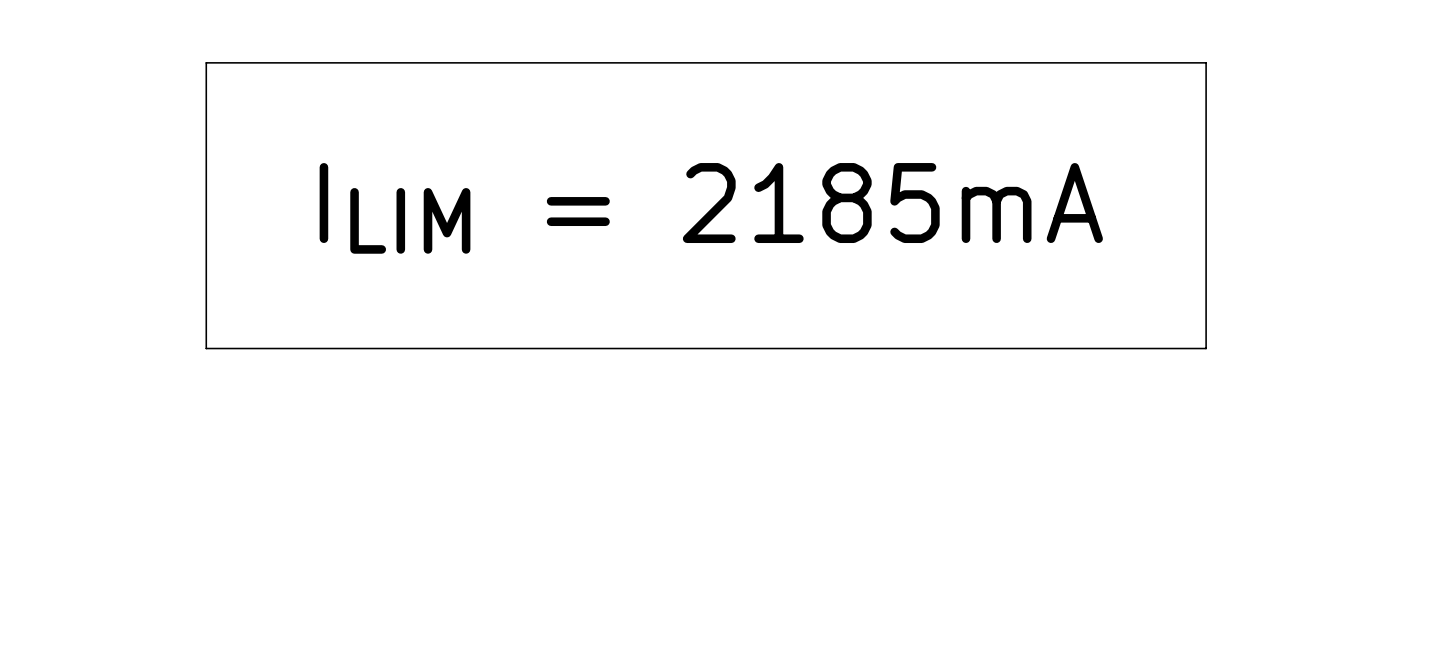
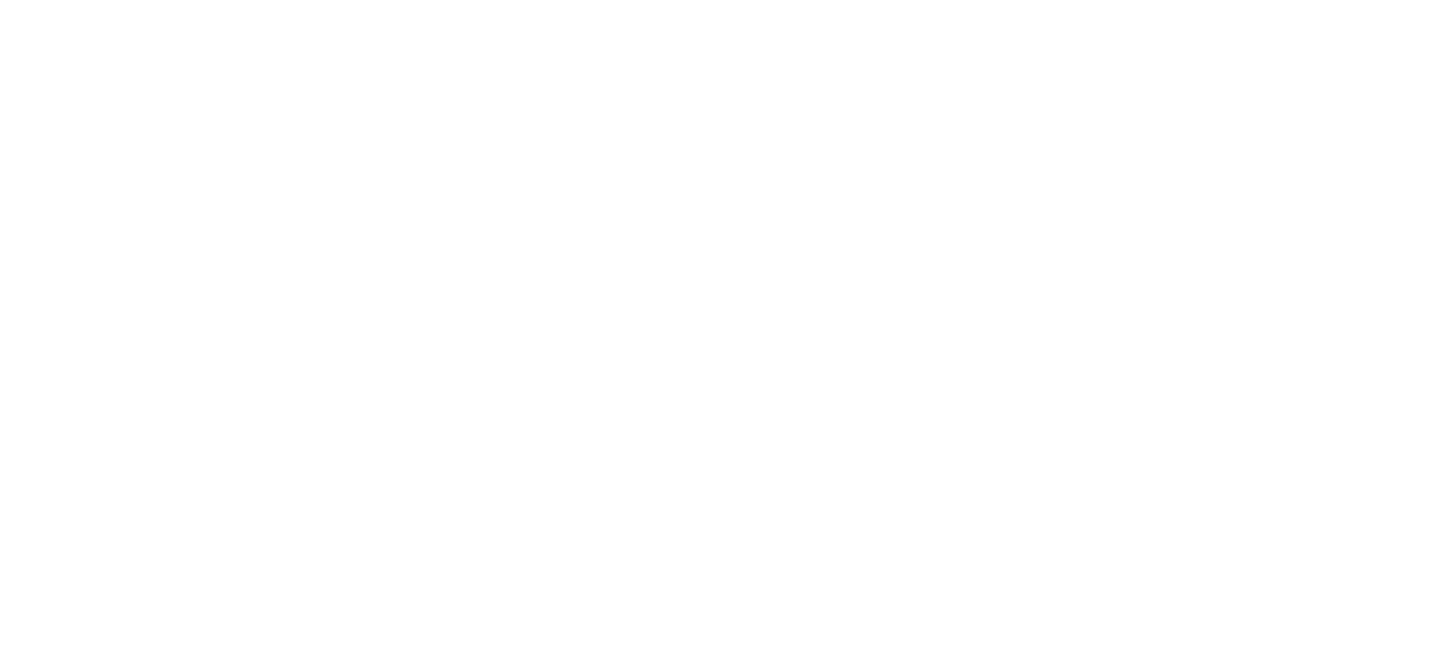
line: (206, 62) (1206, 62) (1206, 348) (206, 348) (206, 62) -> none
text: ILIM = 2185mA (711, 208) -> none

